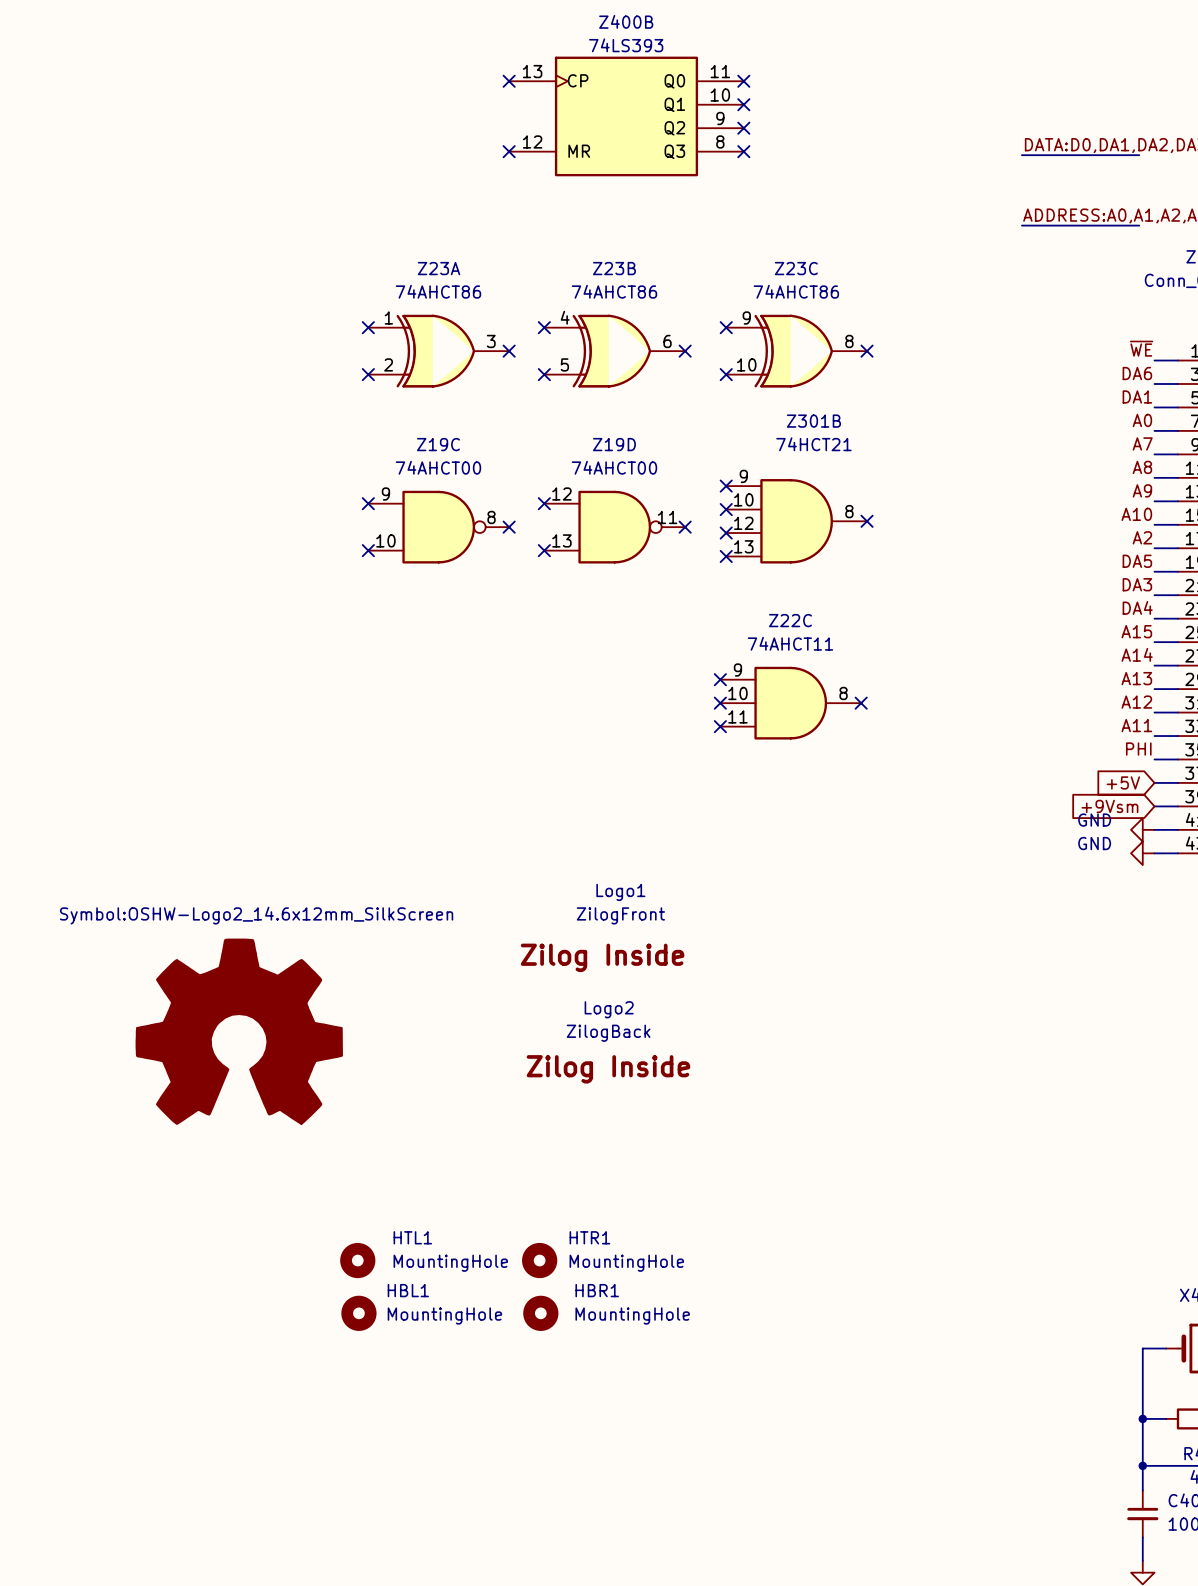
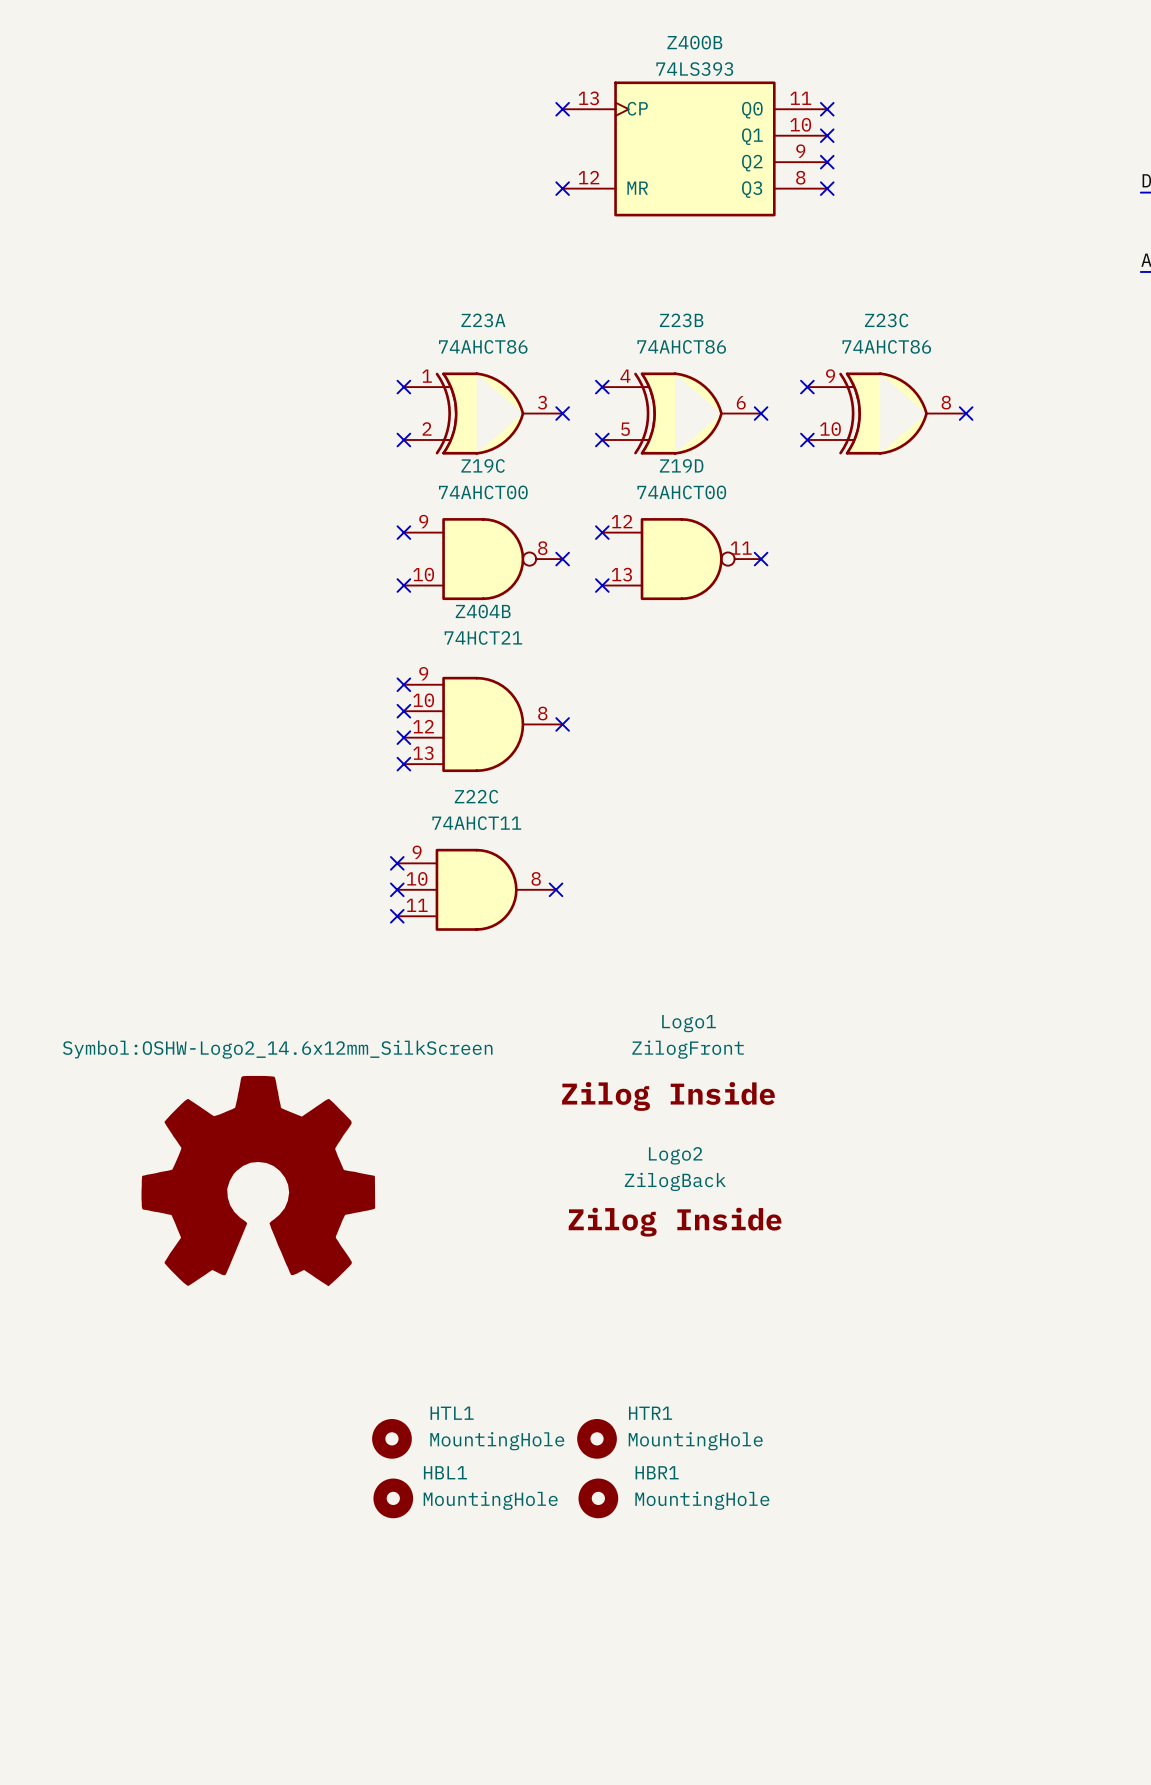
no-connect mark: none -> (403, 532)
no-connect mark: none -> (602, 532)
no-connect mark: none -> (562, 559)
no-connect mark: none -> (761, 559)
no-connect mark: (726, 486) -> none
no-connect mark: (726, 509) -> none
Z301B: 74HCT21 (796, 521) -> none
no-connect mark: (867, 521) -> none
Z19C position: (438, 527) -> (483, 559)
no-connect mark: (509, 527) -> none
Z19D position: (614, 527) -> (681, 559)
no-connect mark: (685, 527) -> none
no-connect mark: (726, 533) -> none
no-connect mark: (368, 550) -> none
no-connect mark: (544, 550) -> none
no-connect mark: (726, 556) -> none
no-connect mark: none -> (403, 684)
no-connect mark: none -> (403, 711)
Z404B: none -> 74HCT21 (483, 724)
no-connect mark: none -> (562, 724)
no-connect mark: none -> (403, 737)
no-connect mark: none -> (403, 764)
no-connect mark: (720, 679) -> none
no-connect mark: (720, 703) -> none
Z22C position: (790, 703) -> (476, 889)
no-connect mark: (861, 703) -> none
no-connect mark: (720, 726) -> none
no-connect mark: none -> (397, 863)
no-connect mark: none -> (397, 889)
no-connect mark: none -> (556, 889)
no-connect mark: none -> (397, 916)

